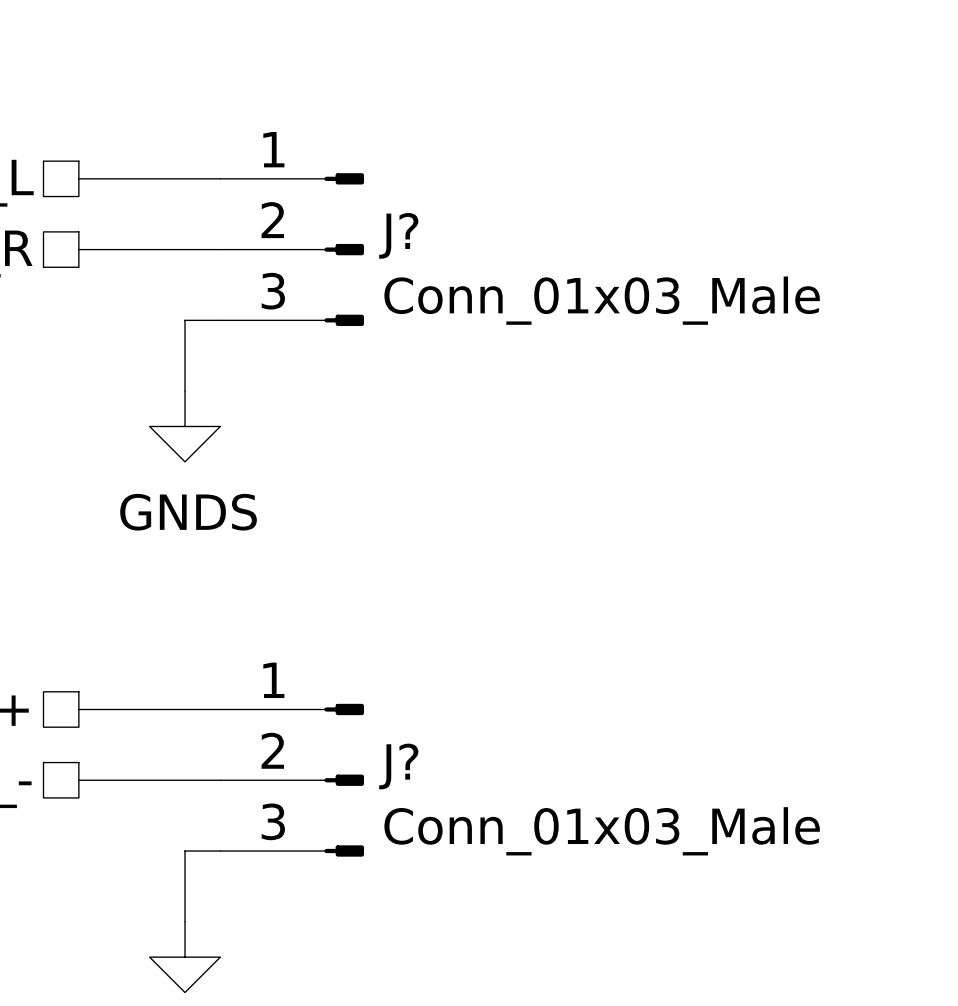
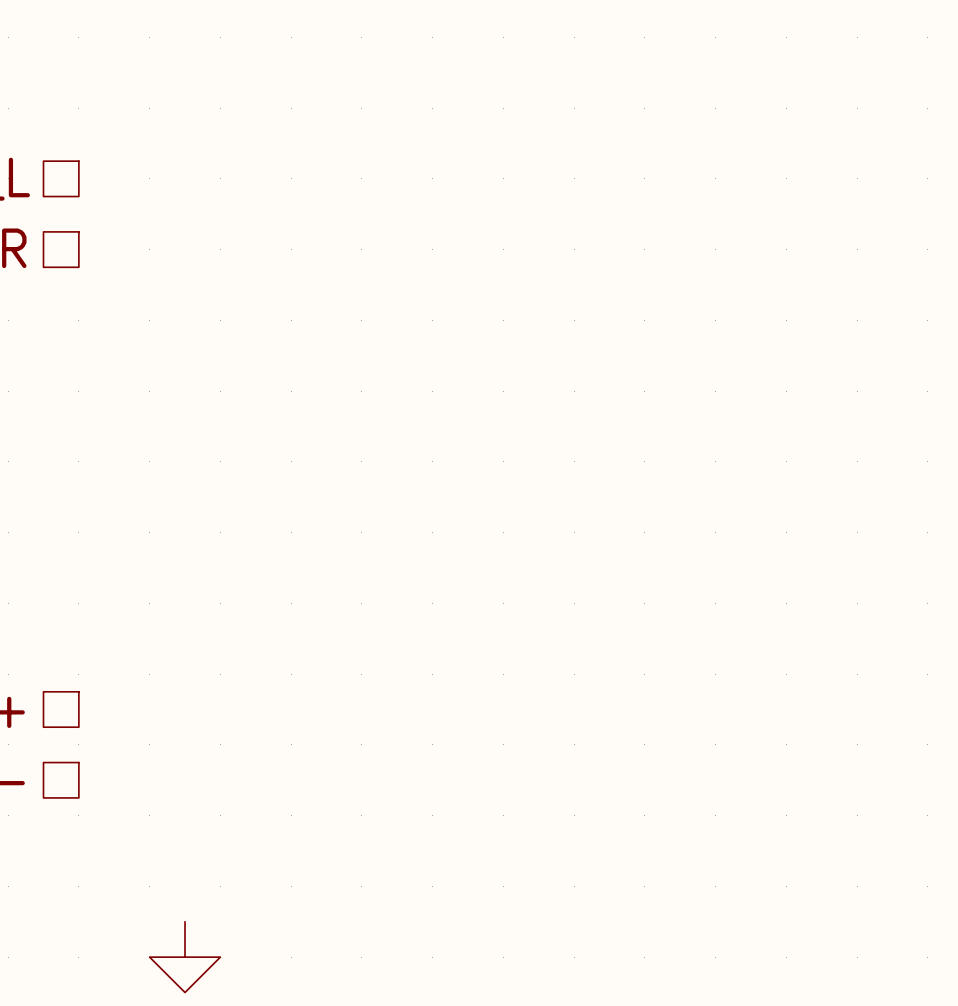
wire: (78, 178) (220, 178) -> none
wire: (78, 249) (220, 249) -> none
J?: Conn_01x03_Male (292, 249) -> none
wire: (220, 320) (185, 320) (185, 391) -> none
power symbol: GNDS (185, 426) -> none
wire: (78, 709) (220, 709) -> none
wire: (78, 780) (220, 780) -> none
J?: Conn_01x03_Male (292, 780) -> none
wire: (220, 851) (185, 851) (185, 921) -> none

